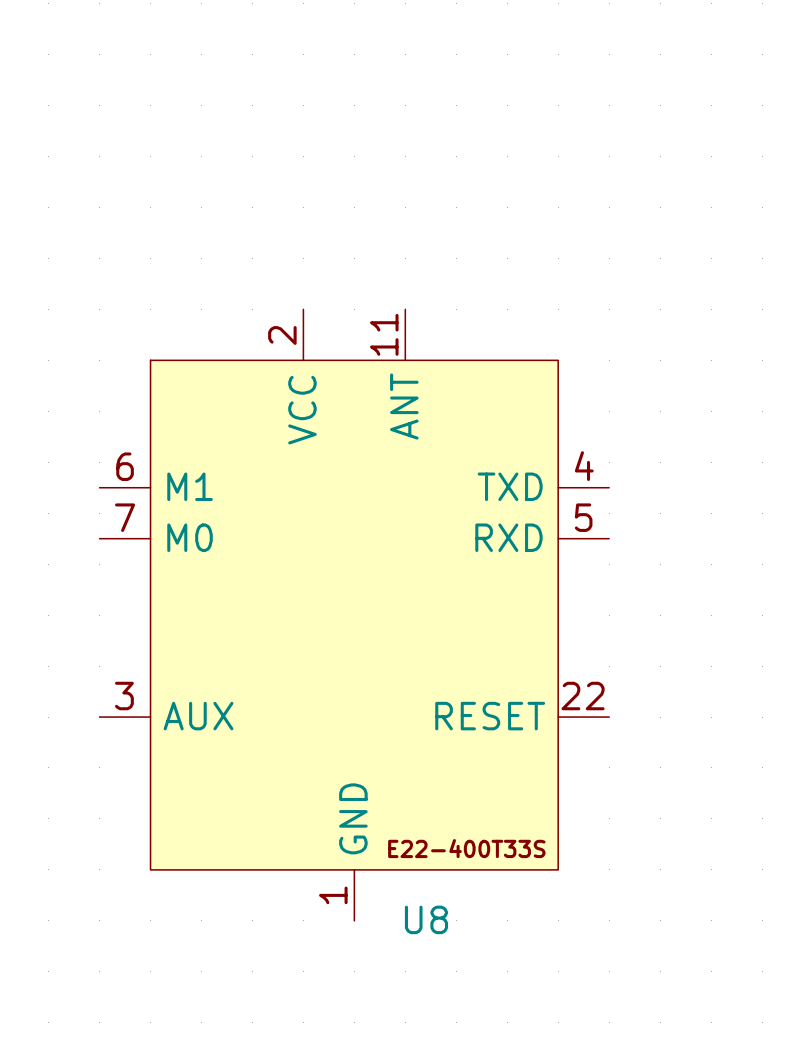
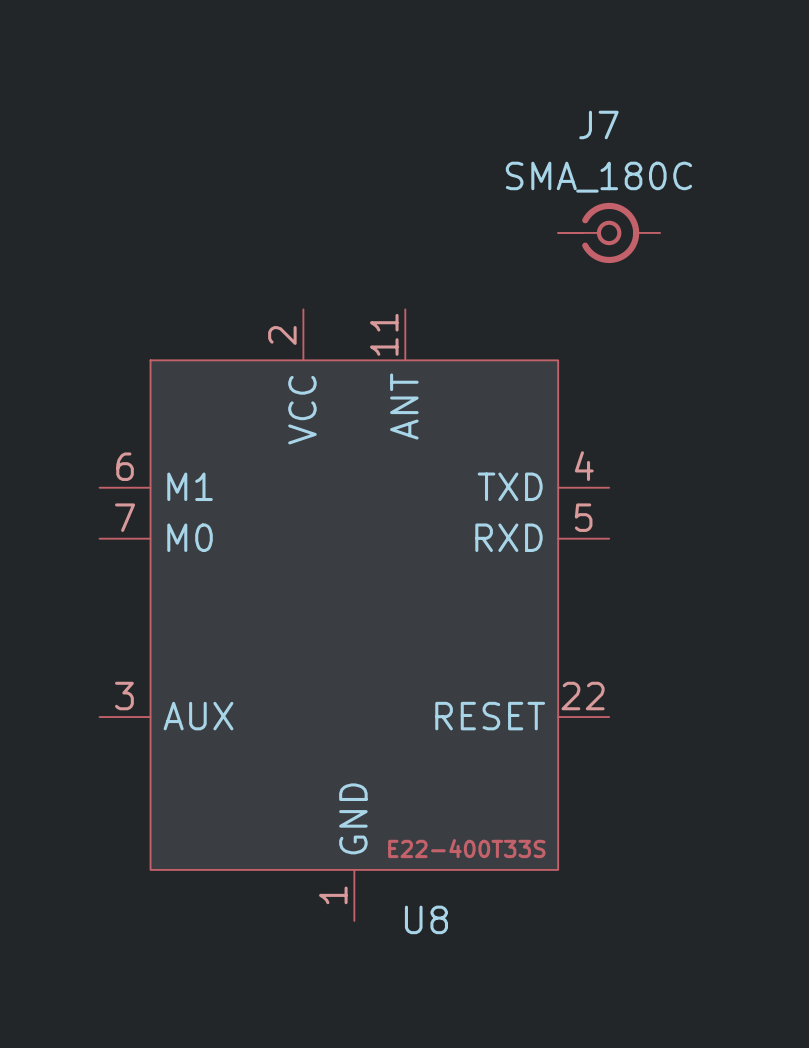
J7: none -> SMA_180C (609, 232)

